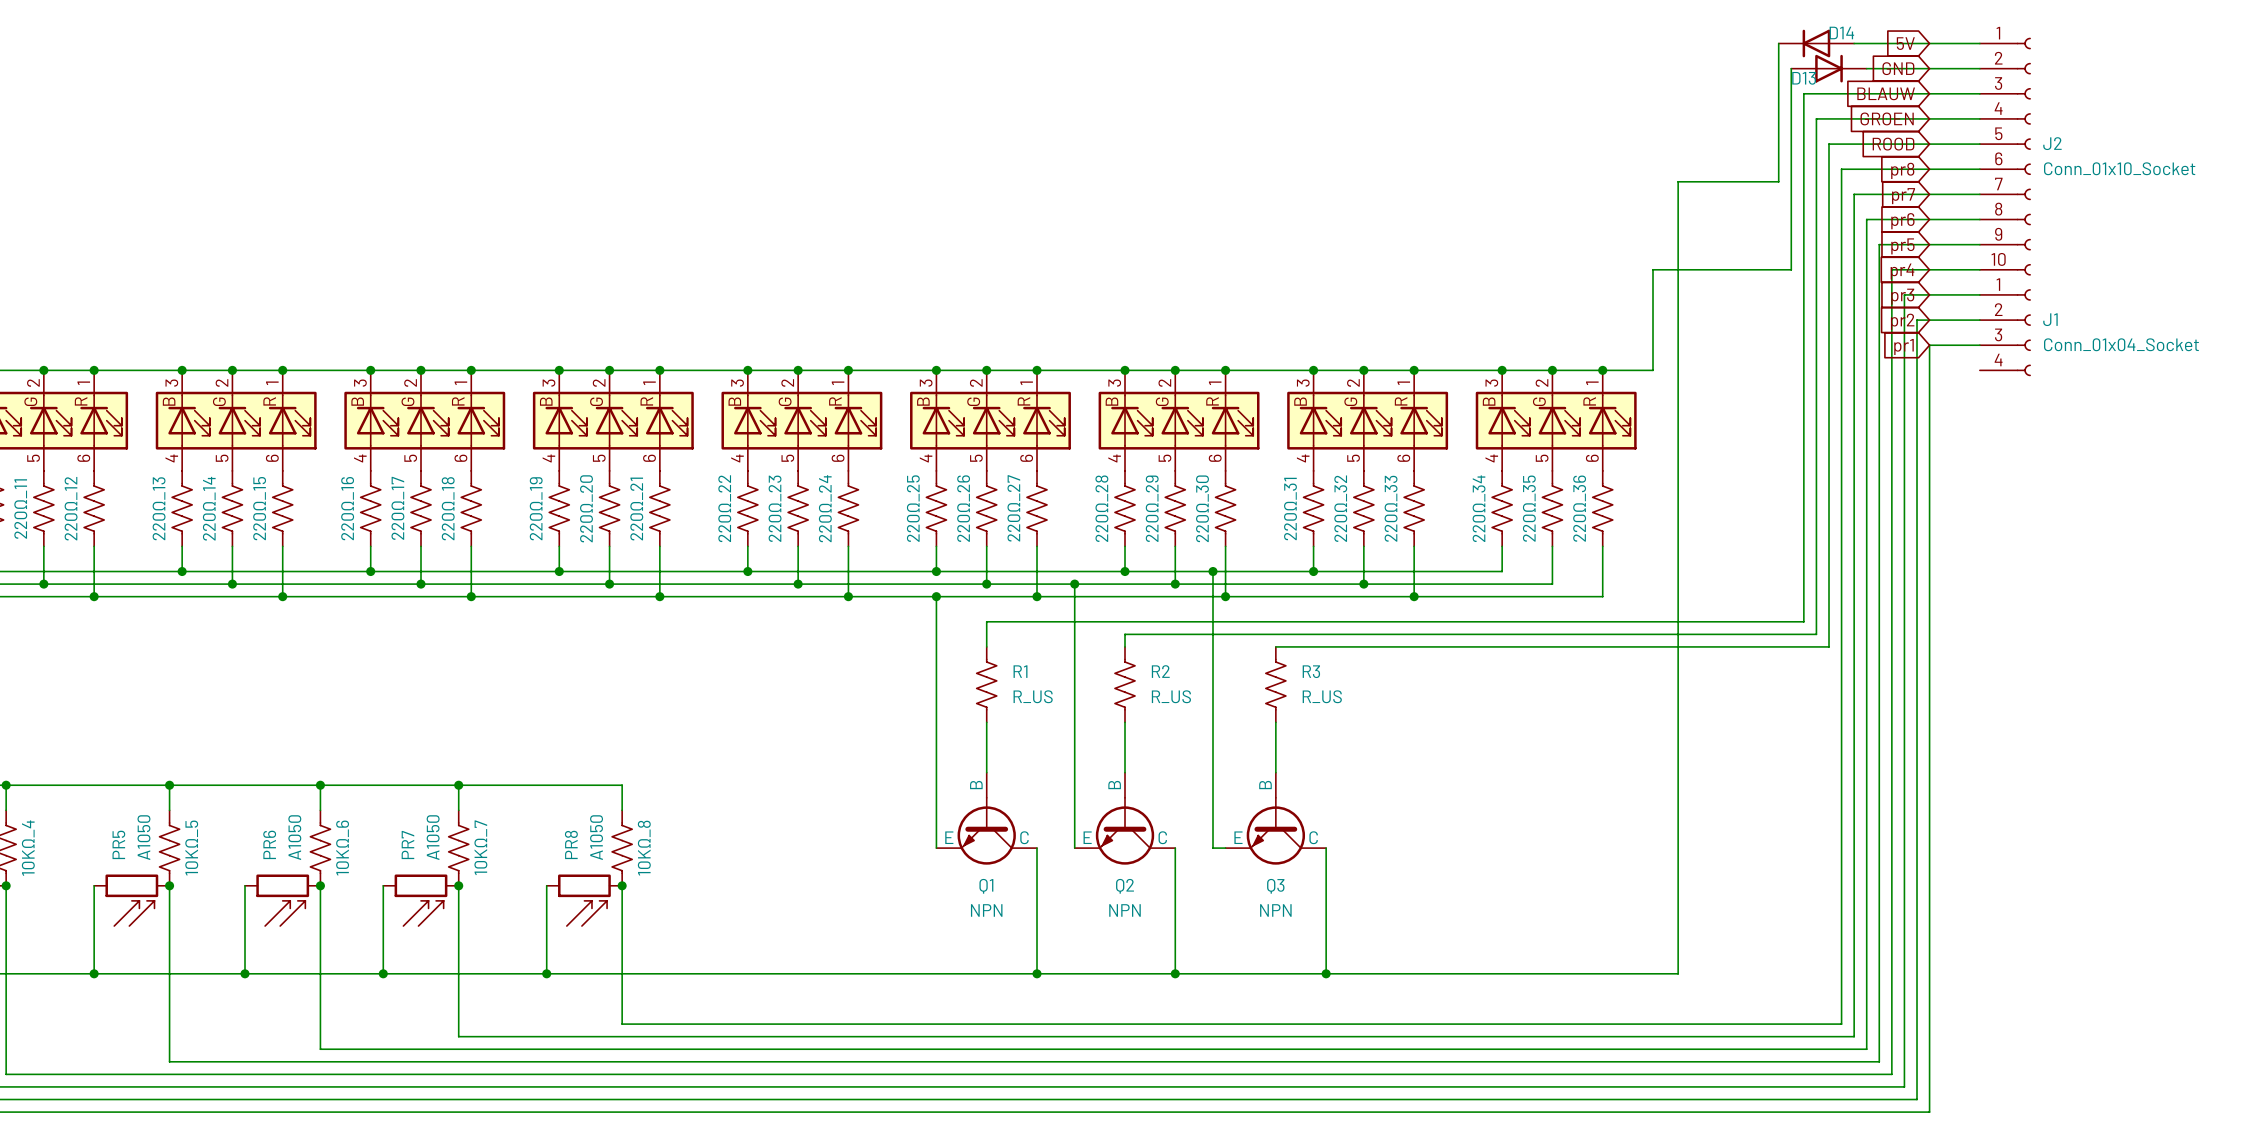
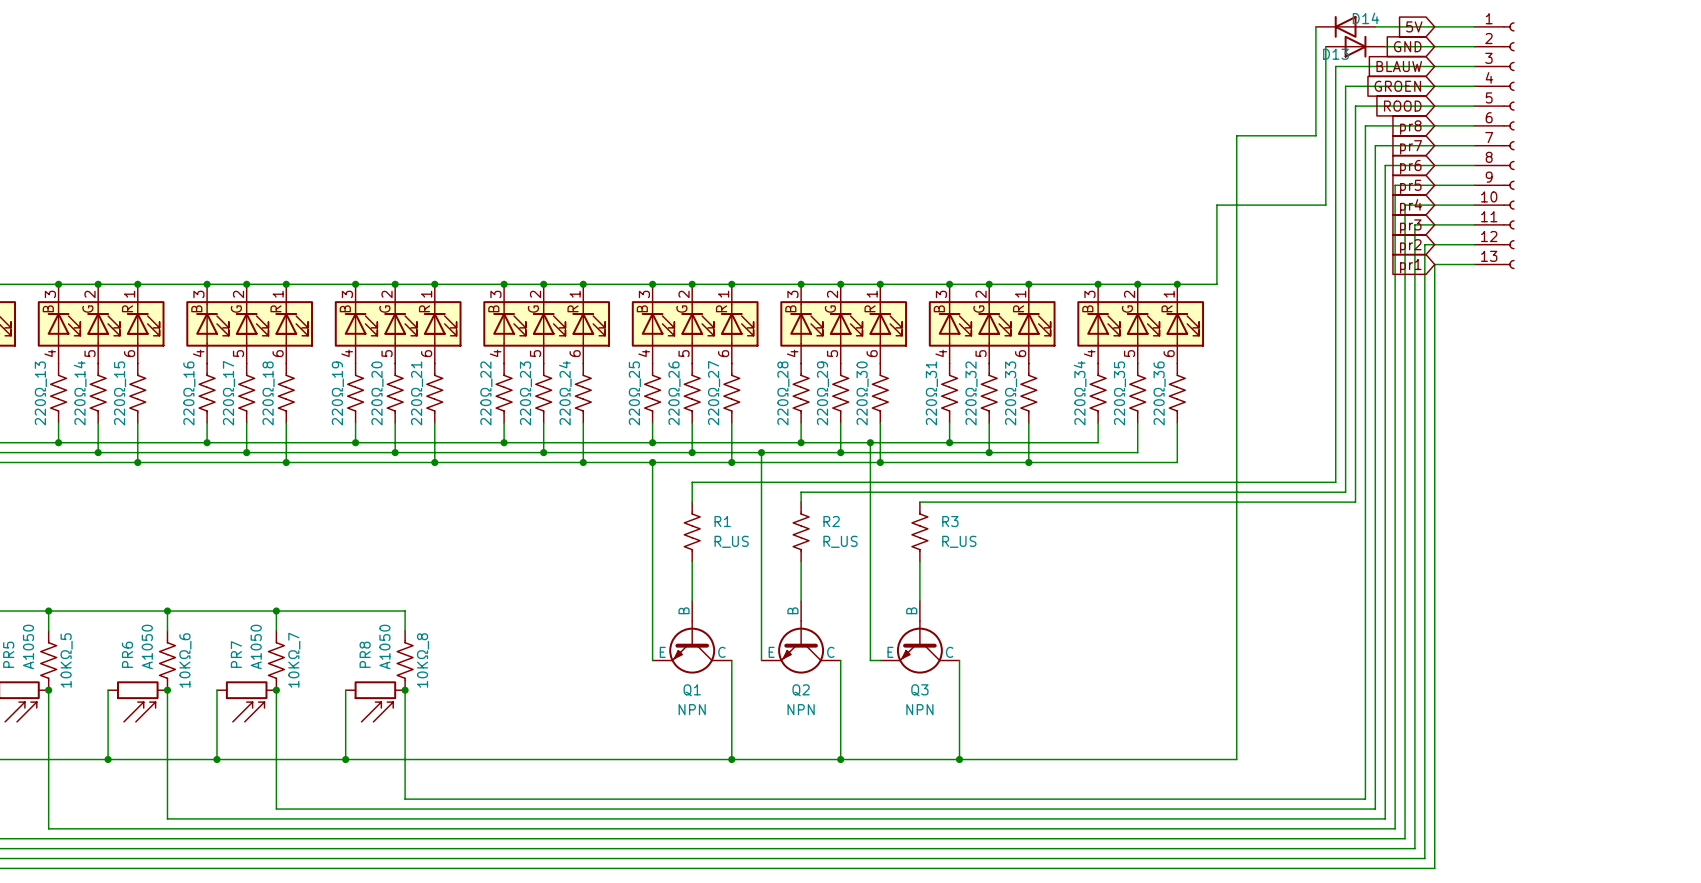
J2: Conn_01x10_Socket (2005, 156) -> none
part: none -> (1494, 145)
J1: Conn_01x04_Socket (2005, 332) -> none

